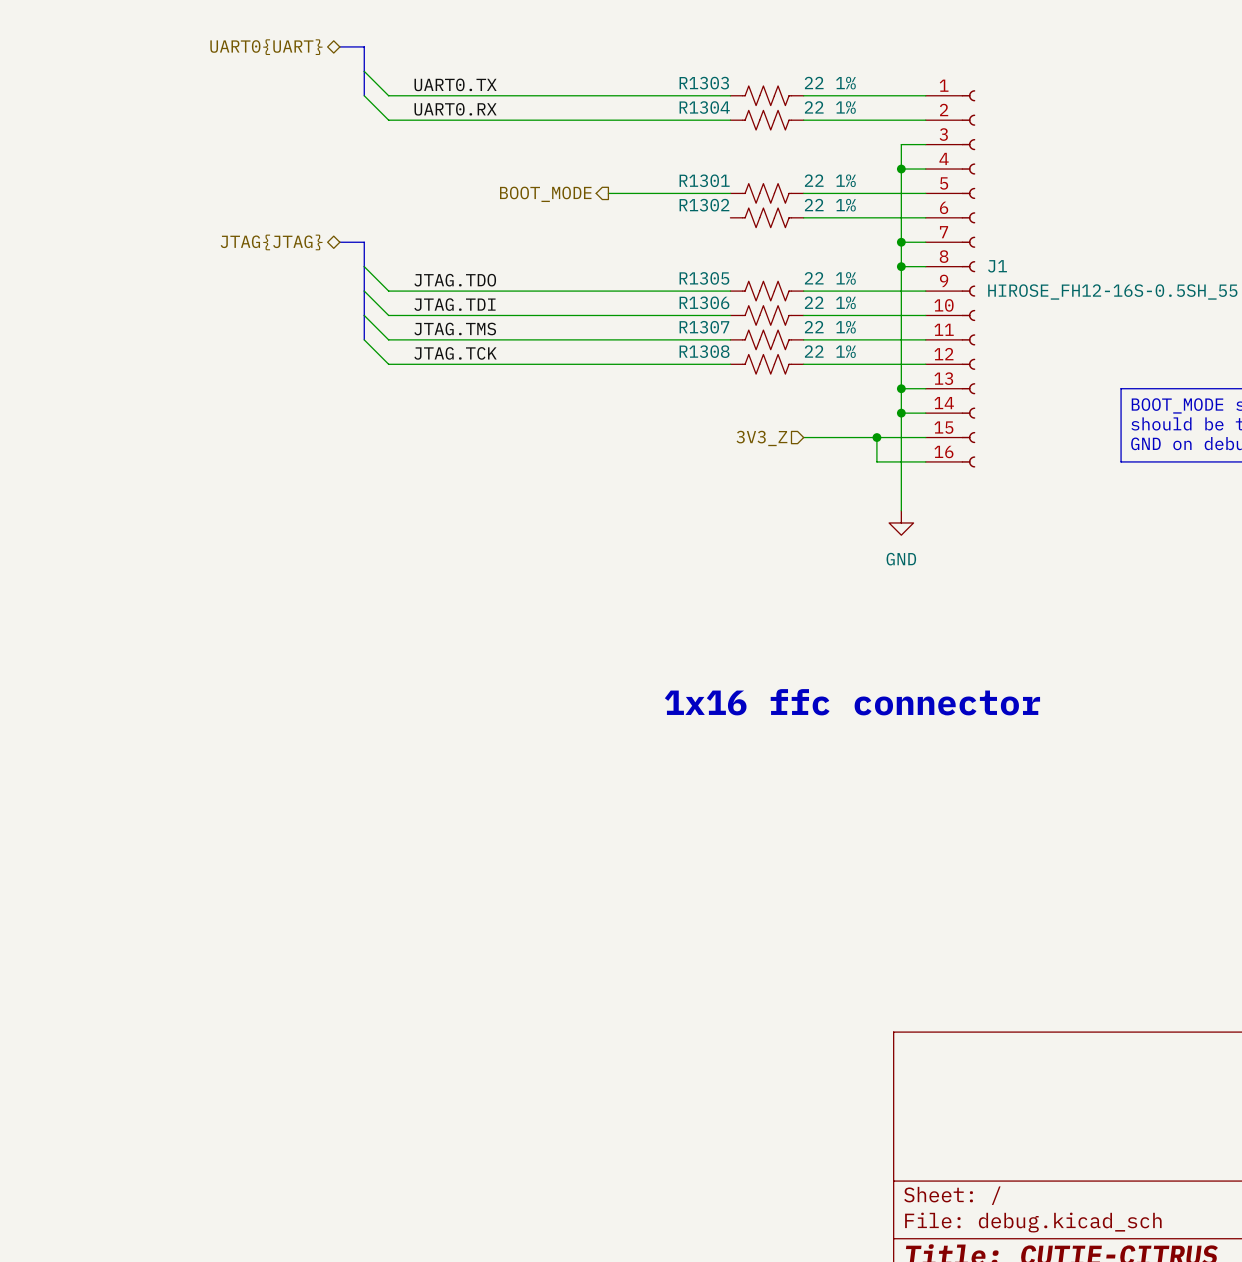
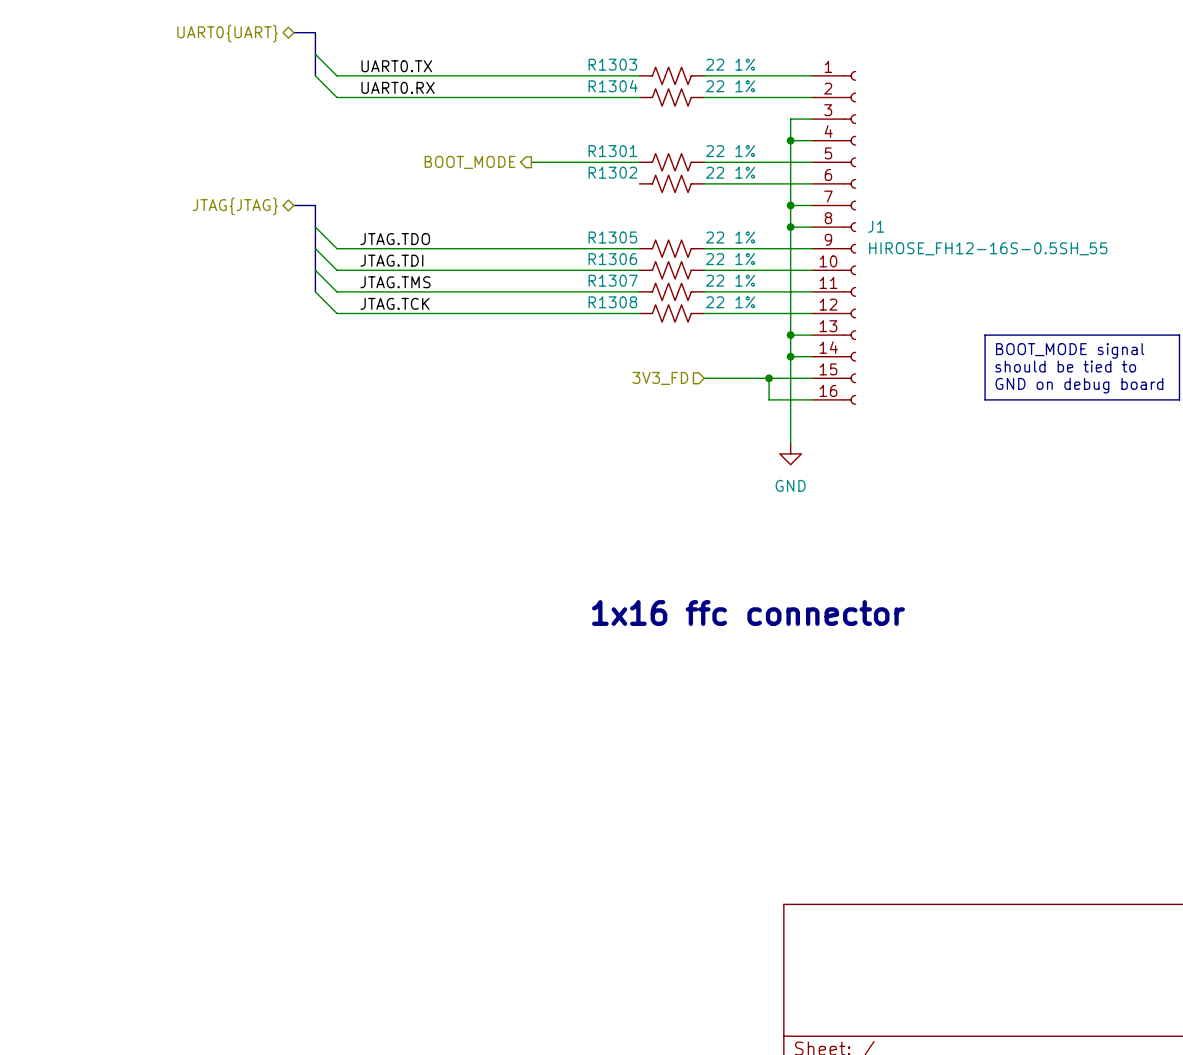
hierarchical label: 3V3_Z (761, 438) -> 3V3_FD (660, 378)

